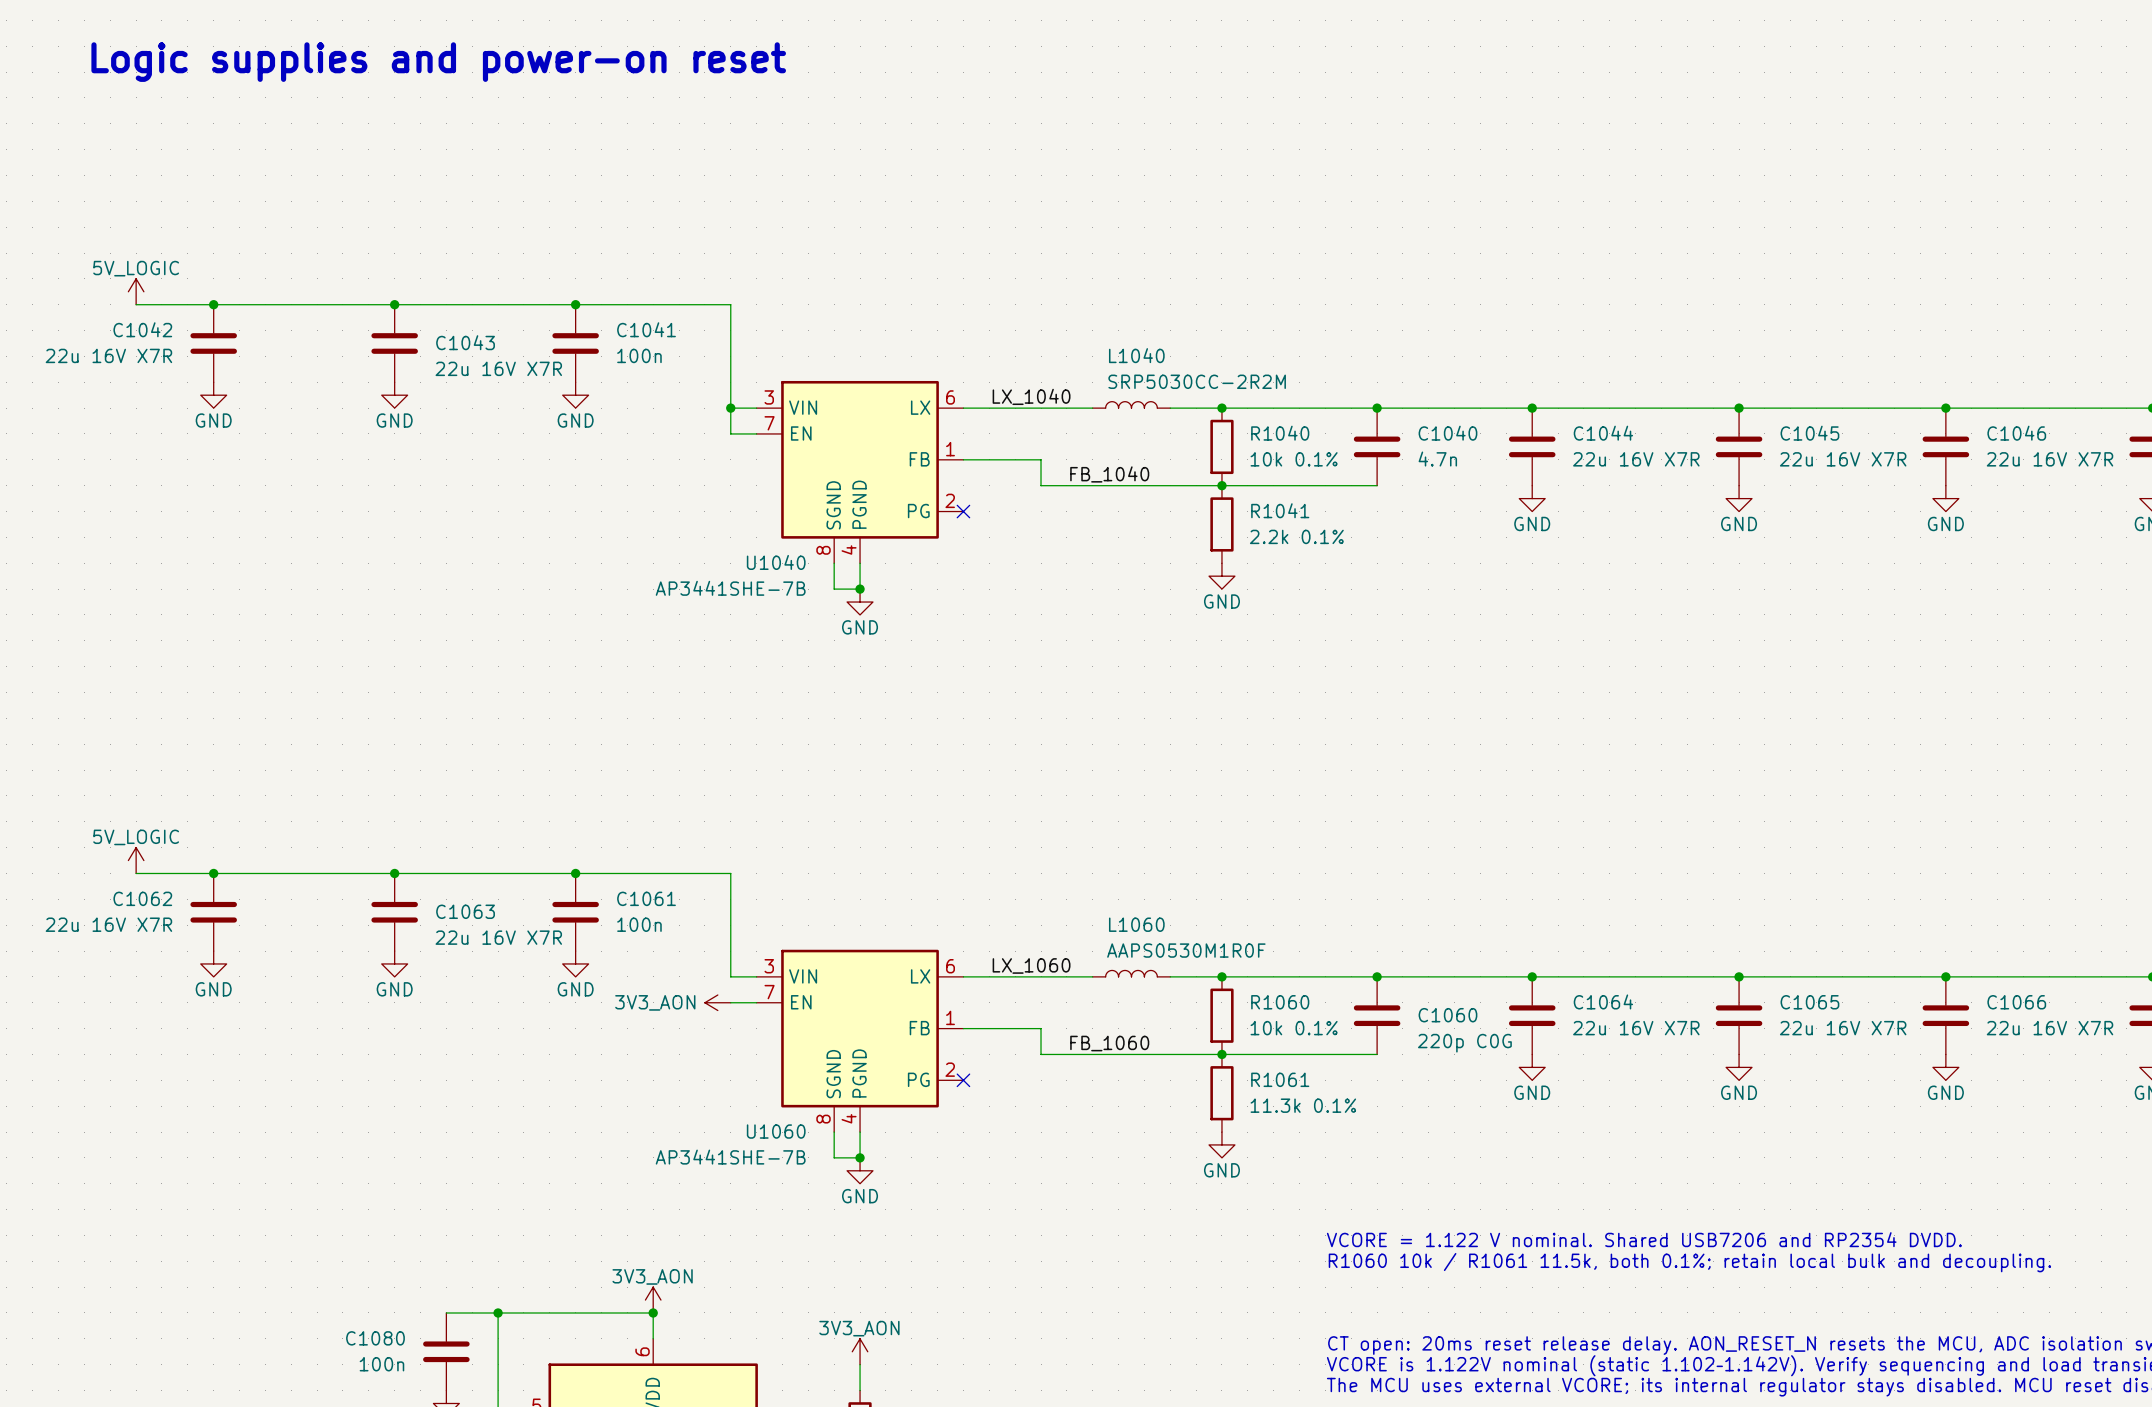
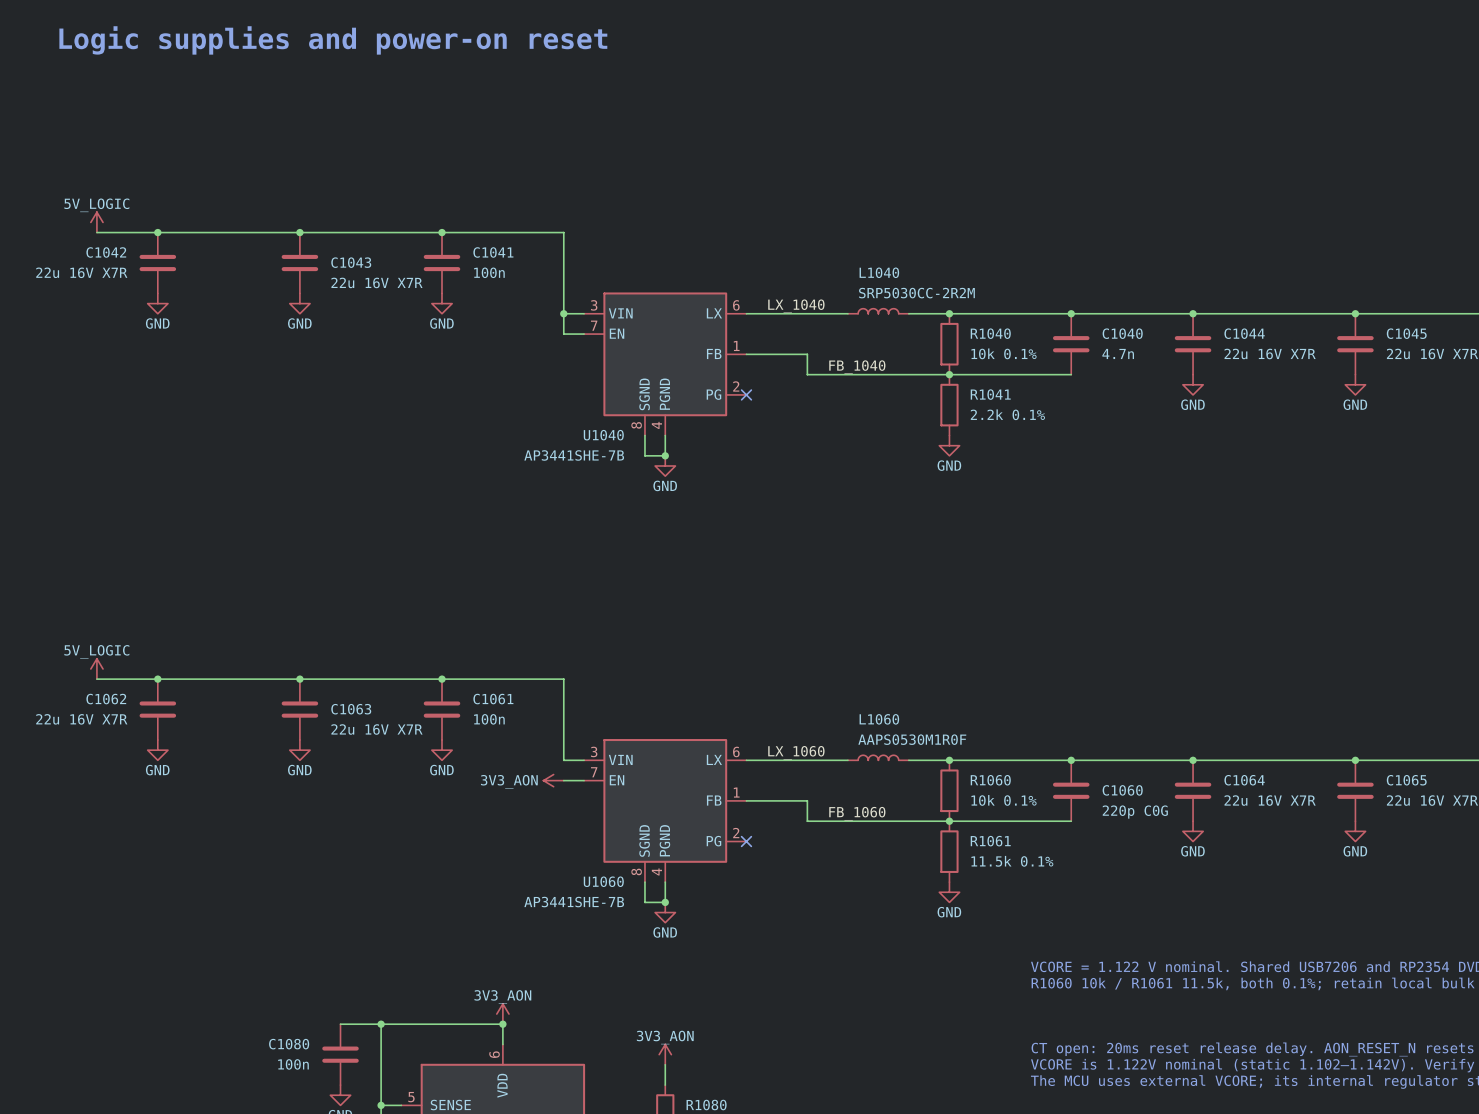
R1061 value: 11.3k 0.1% (1303, 1105) -> 11.5k 0.1% (1012, 861)

